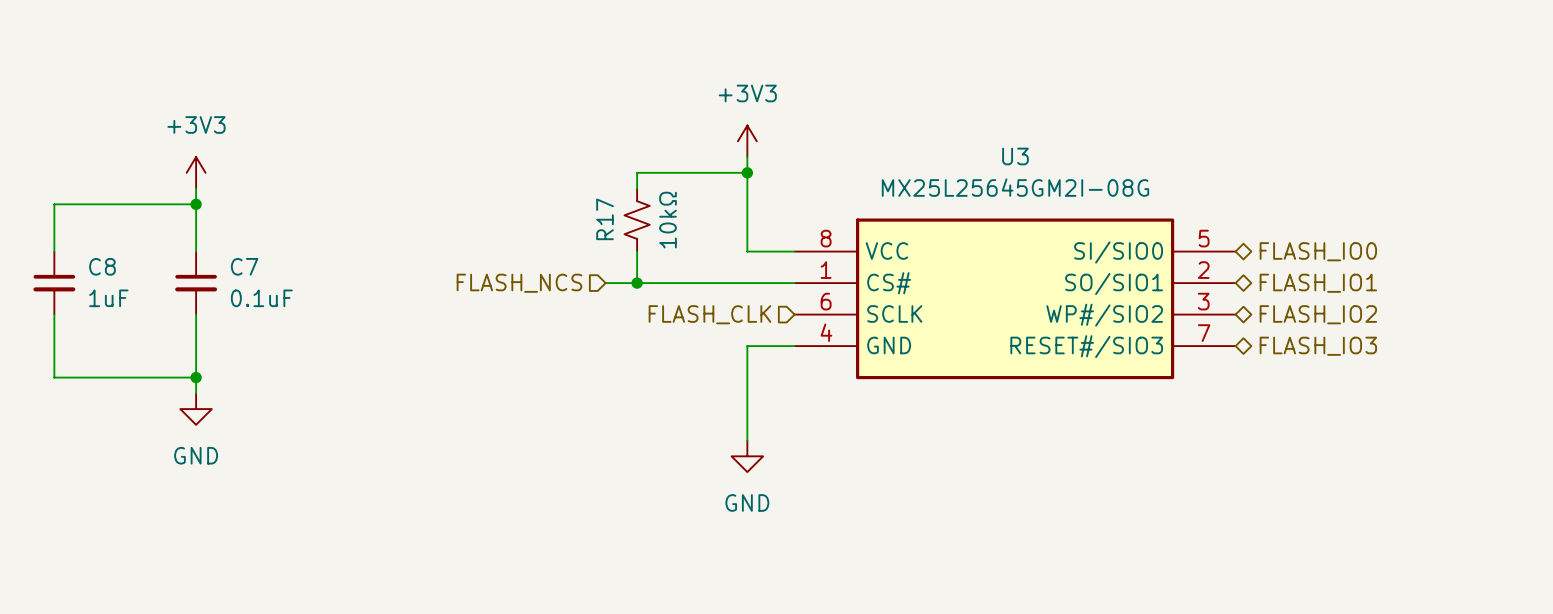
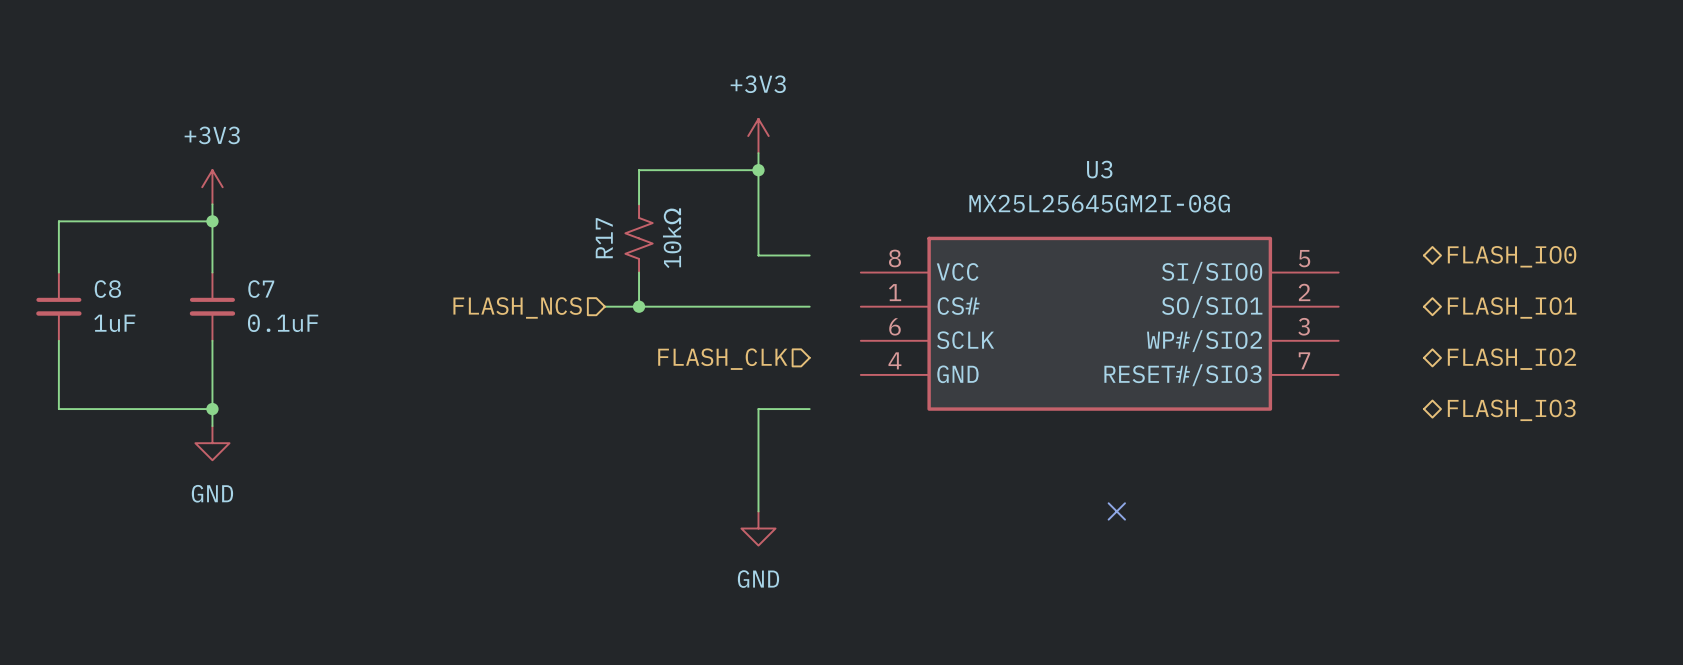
power symbol position: +3V3 (747, 141) -> +3V3 (758, 136)
wire: none -> (758, 170) (639, 170) (639, 204)
wire: (747, 157) (747, 251) (794, 251) -> (758, 153) (758, 255) (809, 255)
wire: (747, 172) (637, 172) (637, 188) -> none
junction position: (747, 172) -> (758, 170)
R17 position: (637, 220) -> (639, 238)
wire: (637, 251) (637, 283) -> (639, 272) (639, 306)
hierarchical label position: FLASH_IO0 (1318, 251) -> FLASH_IO0 (1512, 256)
hierarchical label position: FLASH_NCS (519, 283) -> FLASH_NCS (517, 307)
junction position: (637, 283) -> (639, 306)
wire: (747, 283) (794, 283) -> (604, 306) (656, 306)
hierarchical label position: FLASH_IO1 (1318, 283) -> FLASH_IO1 (1512, 307)
hierarchical label position: FLASH_CLK (709, 314) -> FLASH_CLK (722, 359)
hierarchical label position: FLASH_IO2 (1318, 314) -> FLASH_IO2 (1511, 359)
wire: (794, 346) (747, 346) (747, 440) -> (809, 409) (758, 409) (758, 511)
hierarchical label position: FLASH_IO3 (1318, 346) -> FLASH_IO3 (1511, 410)
power symbol position: GND (747, 456) -> GND (758, 528)
no-connect mark: none -> (1116, 511)

